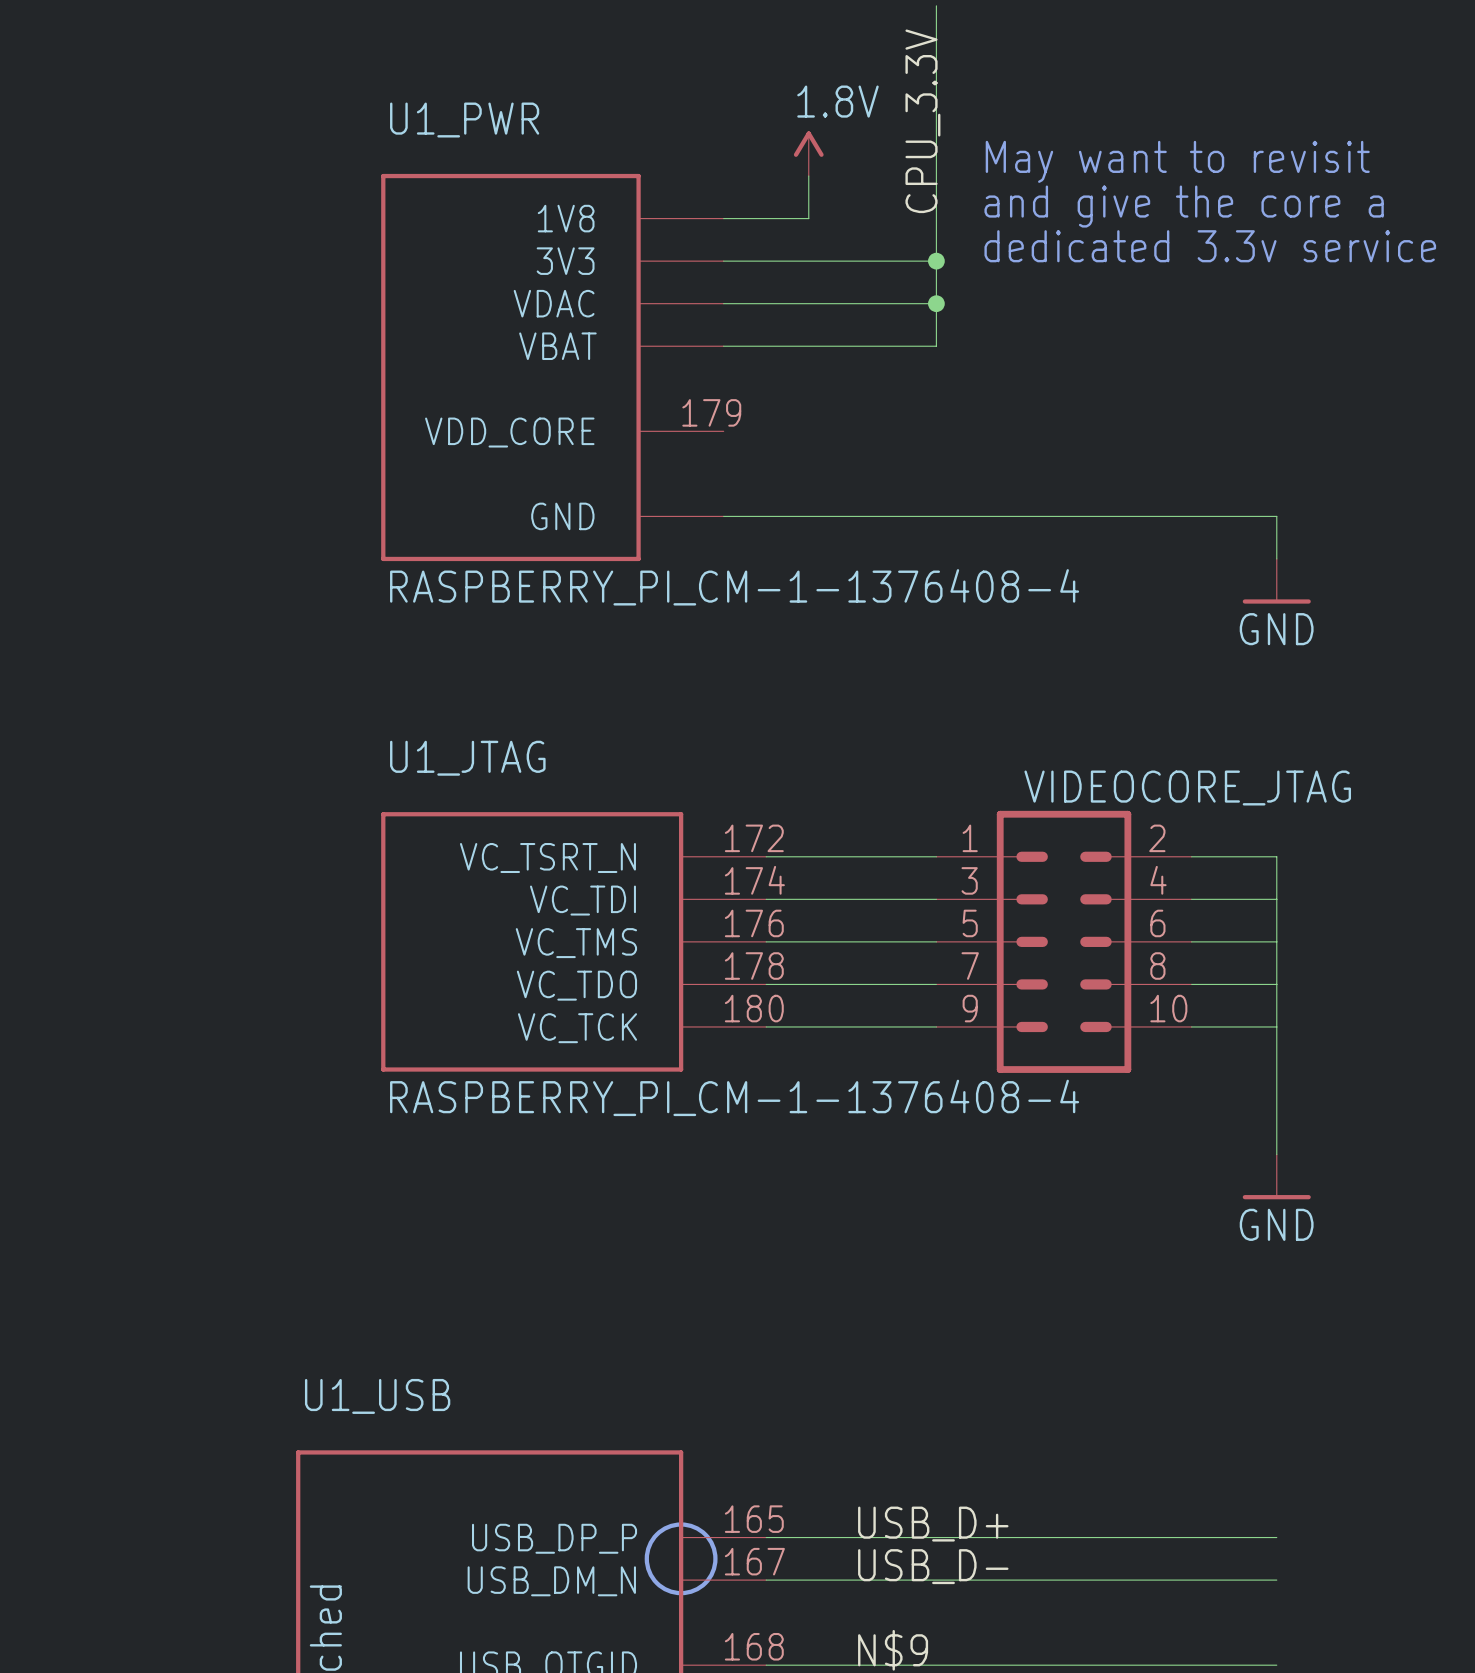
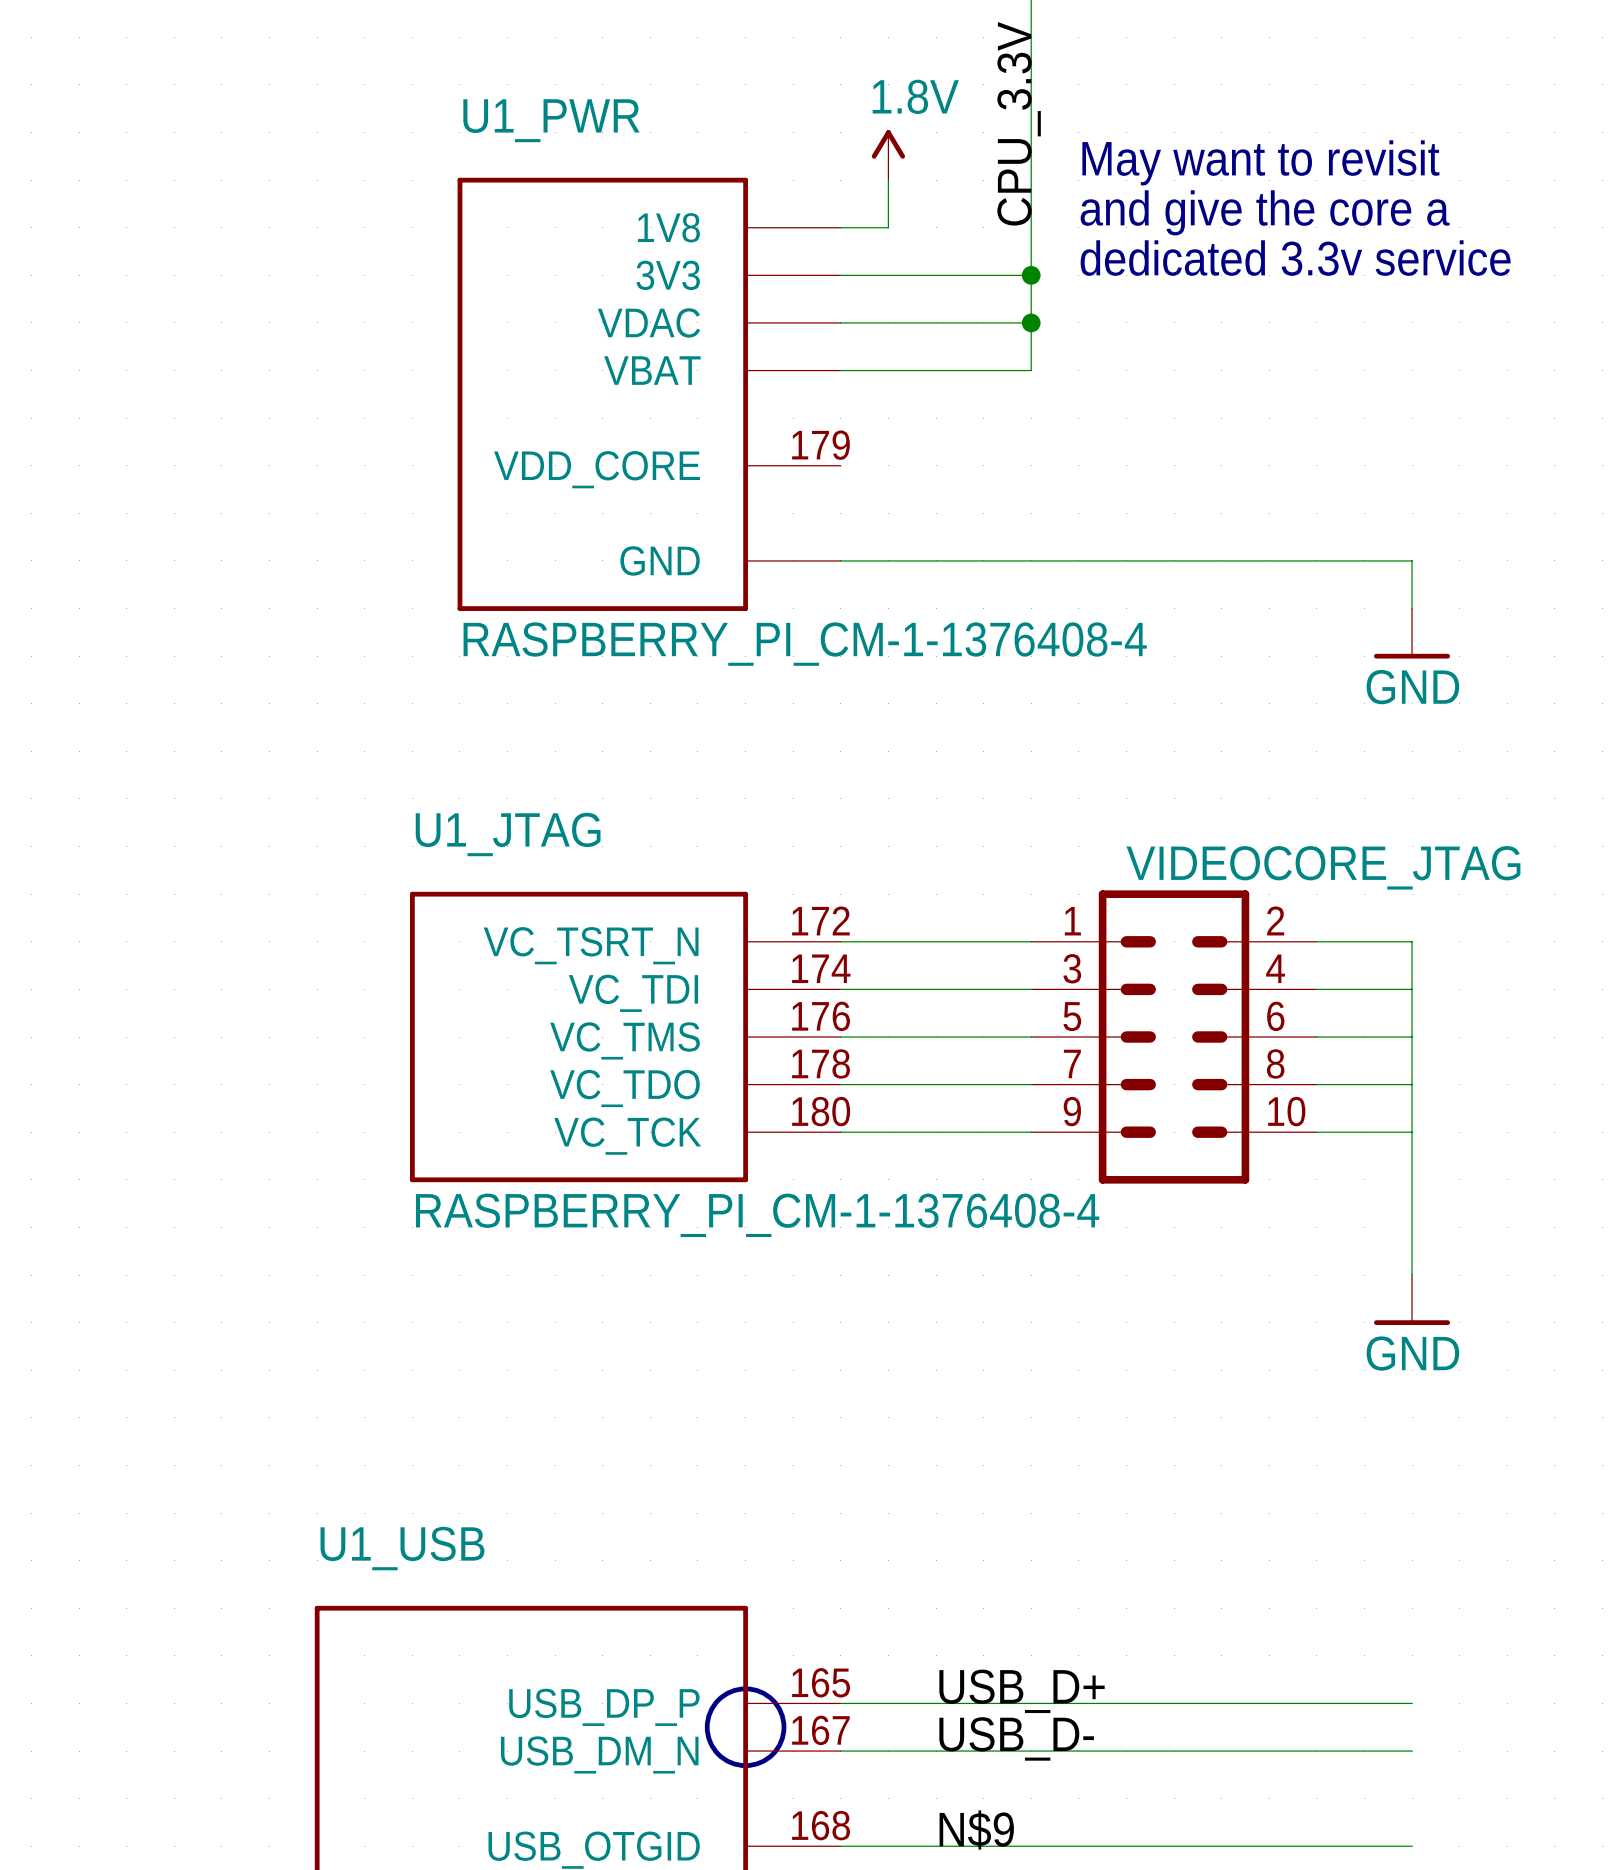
U1_PWR position: (552, 367) -> (649, 394)

